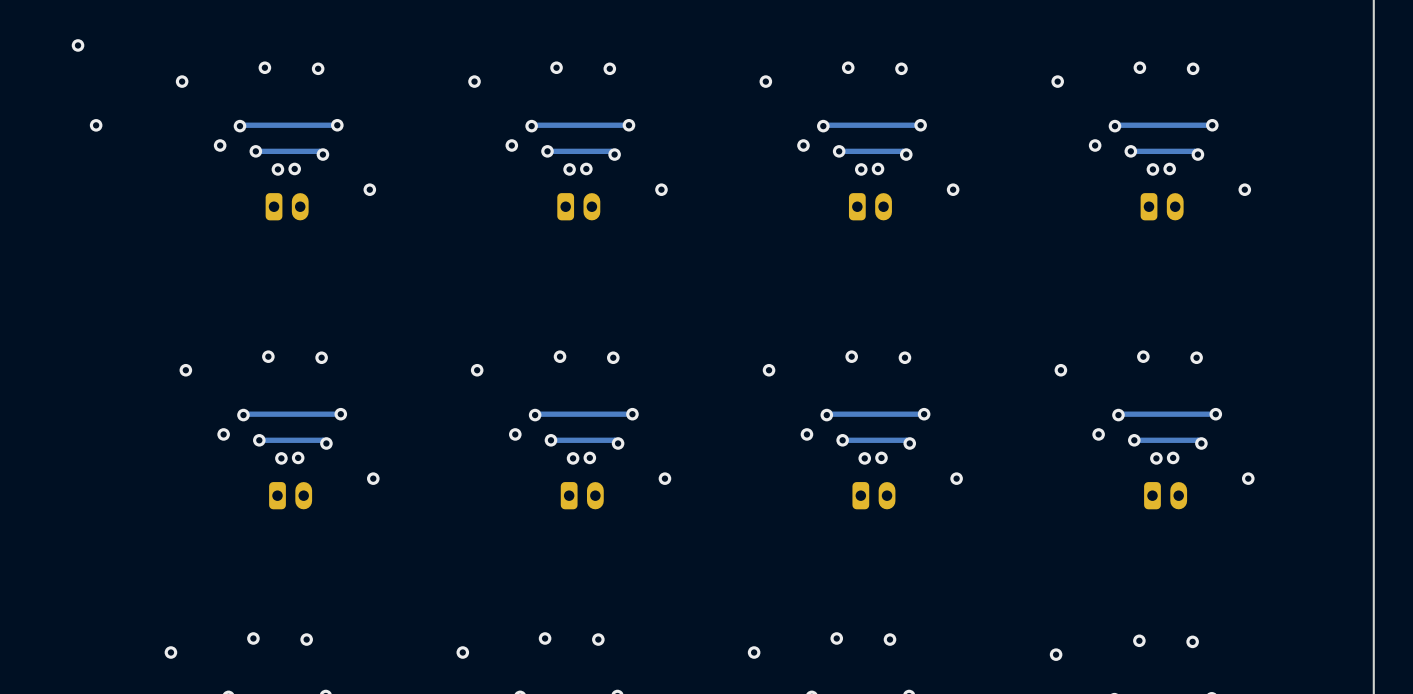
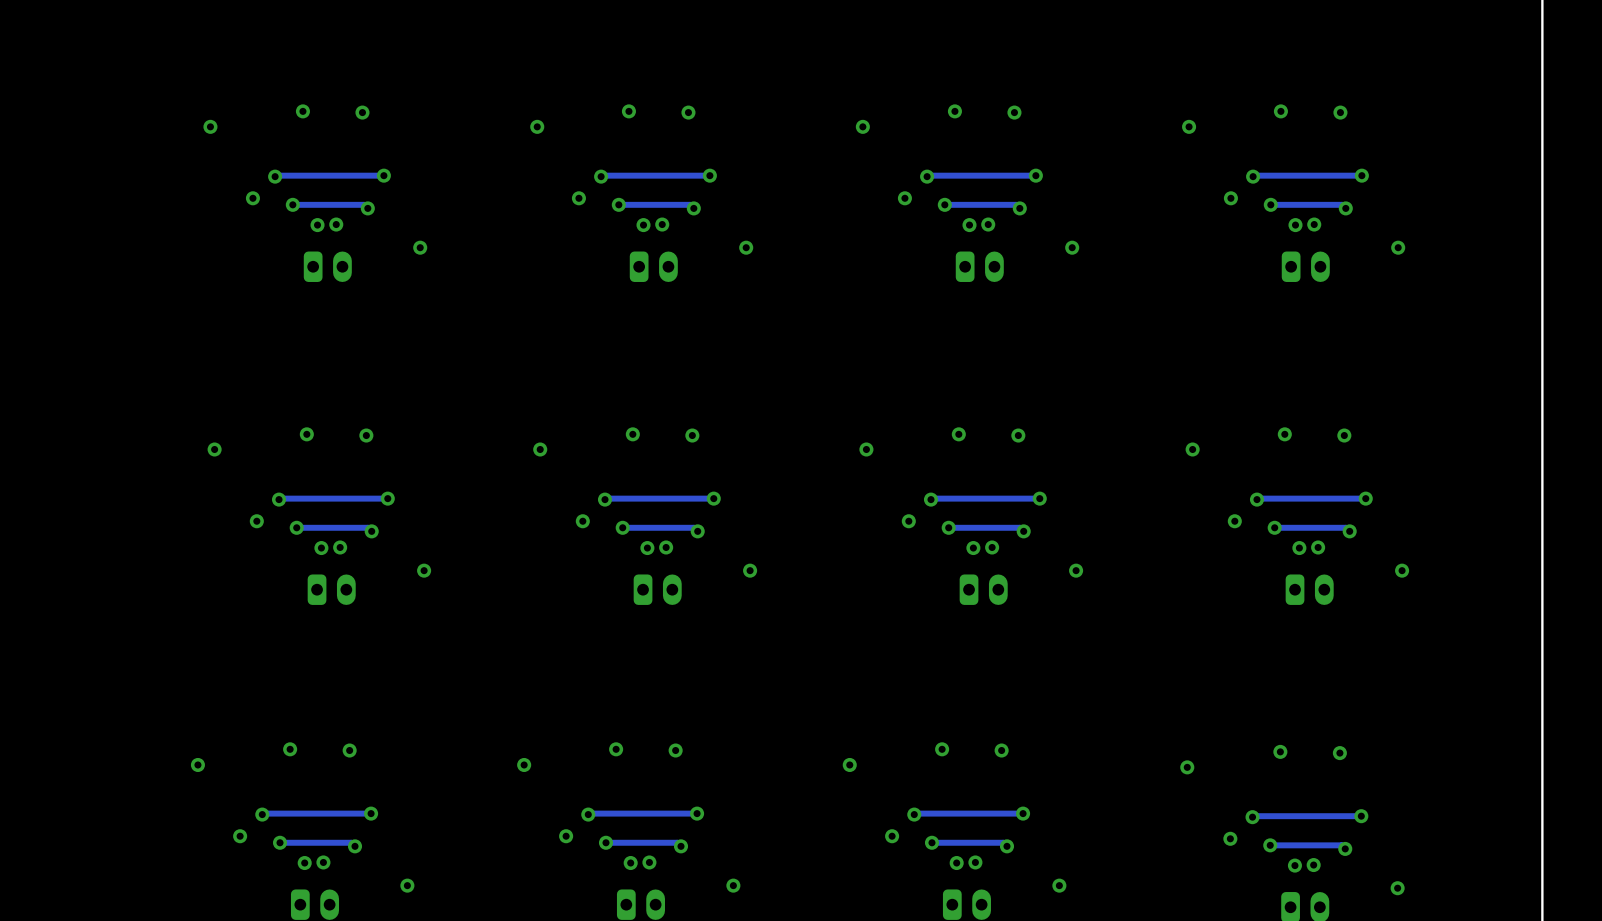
via: (78, 45) -> none
via: (96, 125) -> none

